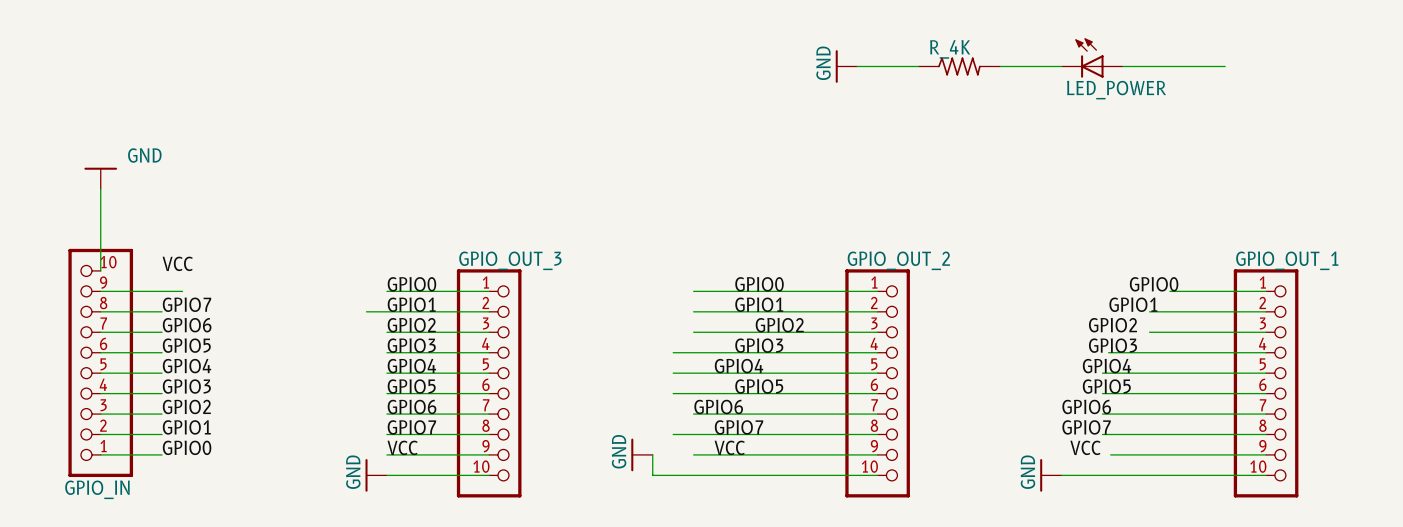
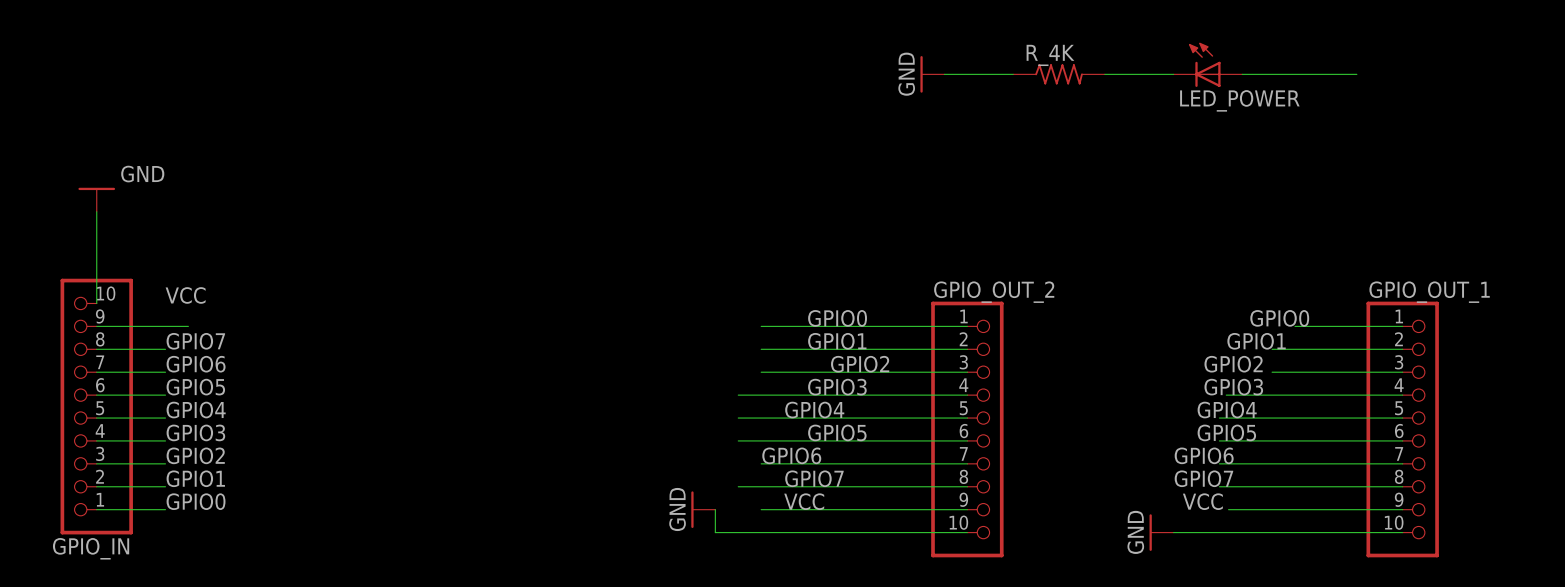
label: GPIO0 (411, 284) -> none
wire: (386, 291) (489, 291) -> none
label: GPIO1 (411, 304) -> none
wire: (366, 311) (489, 311) -> none
label: GPIO2 (411, 325) -> none
wire: (386, 332) (489, 332) -> none
label: GPIO3 (411, 345) -> none
wire: (386, 352) (489, 352) -> none
label: GPIO4 (411, 366) -> none
wire: (386, 373) (489, 373) -> none
GPIO_OUT_3: (489, 383) -> none
label: GPIO5 (411, 386) -> none
wire: (386, 393) (489, 393) -> none
label: GPIO6 (412, 406) -> none
wire: (386, 414) (489, 414) -> none
label: GPIO7 (411, 427) -> none
wire: (386, 434) (489, 434) -> none
label: VCC (402, 447) -> none
wire: (386, 454) (489, 454) -> none
power symbol: GND (376, 475) -> none
wire: (386, 475) (489, 475) -> none

